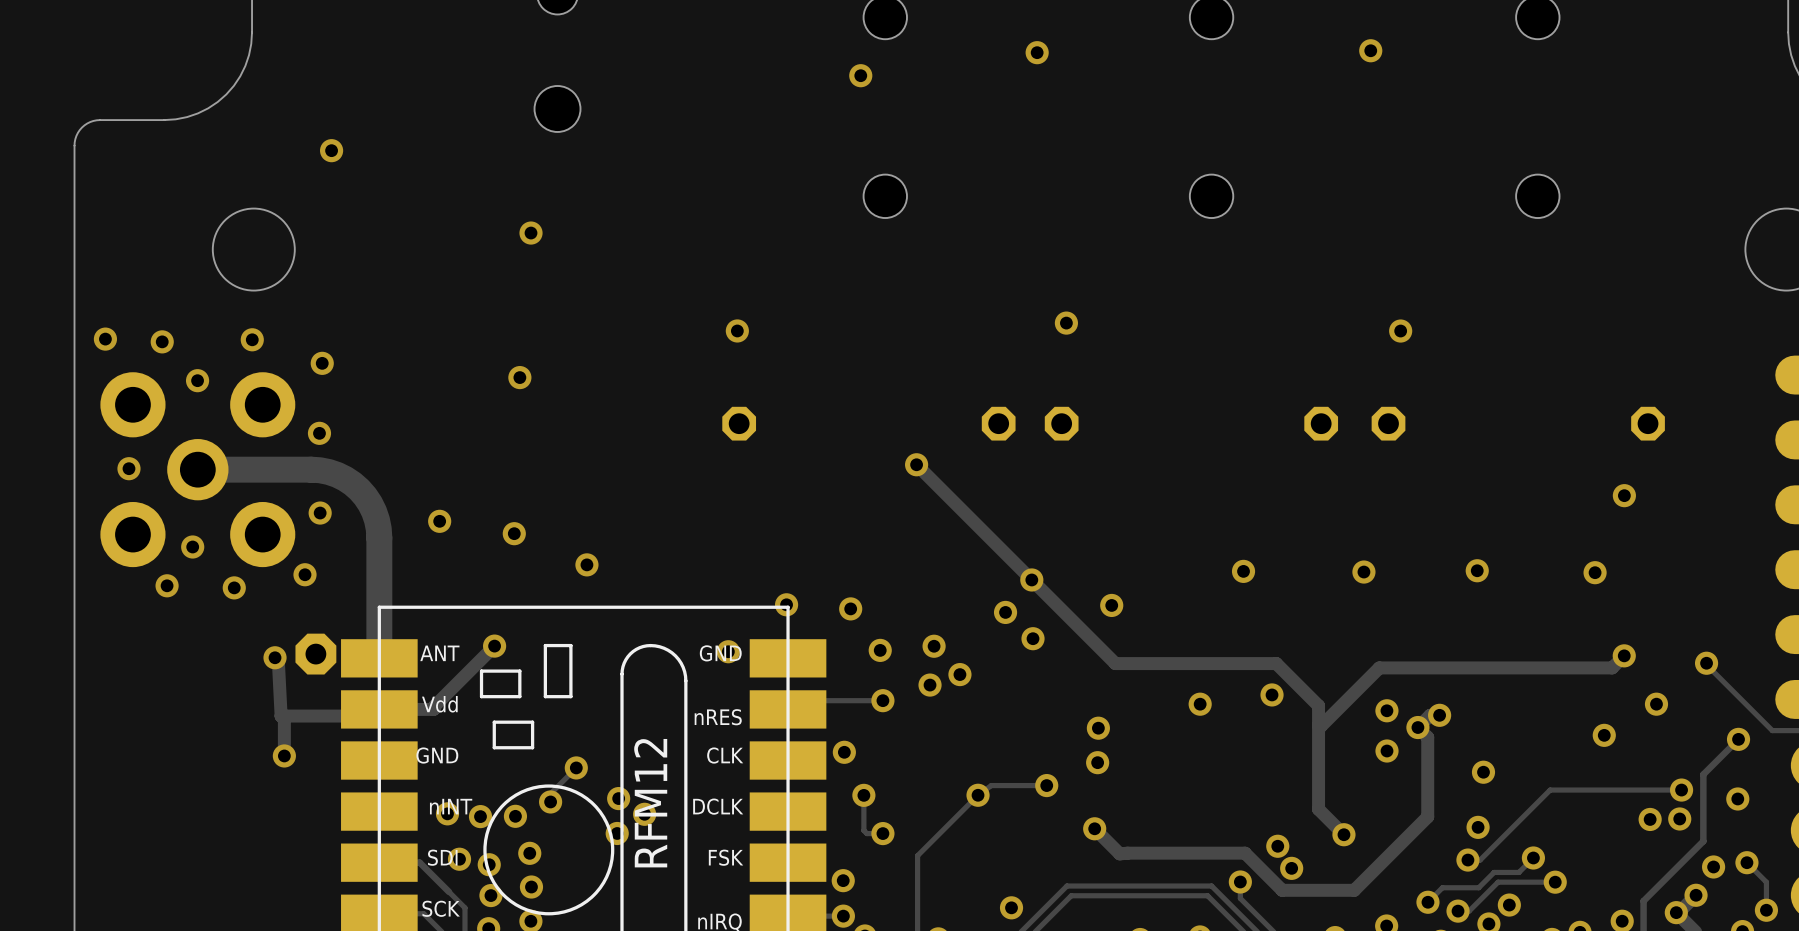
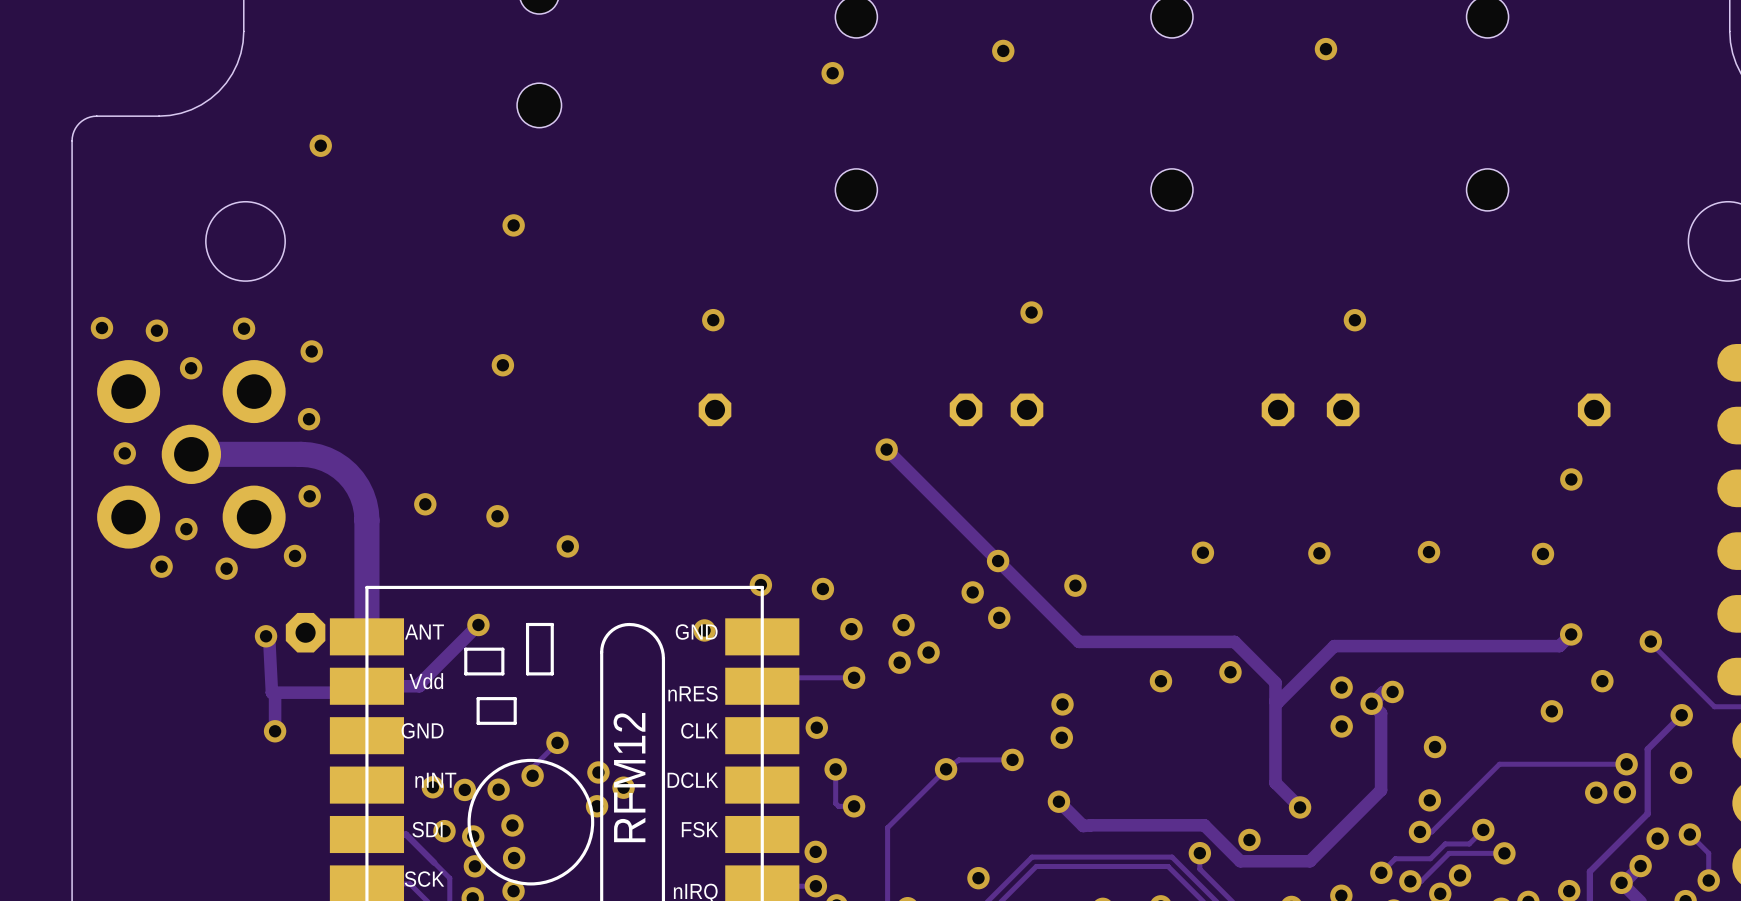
via: (1277, 846) -> none

